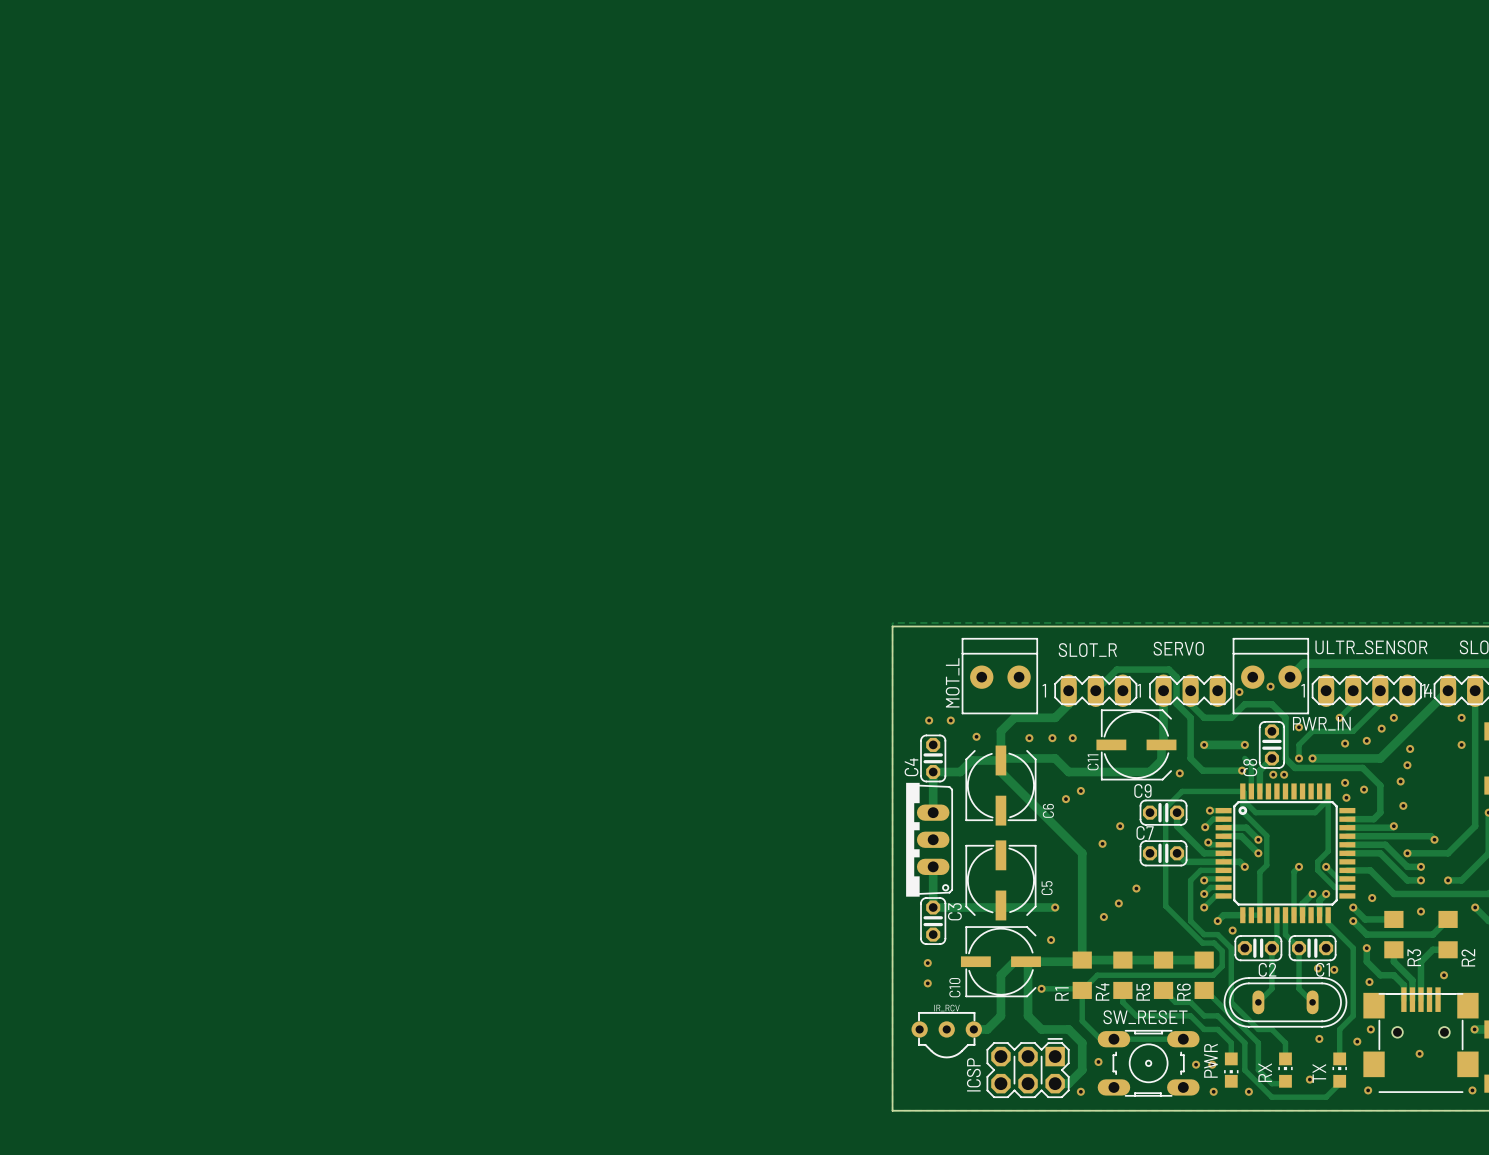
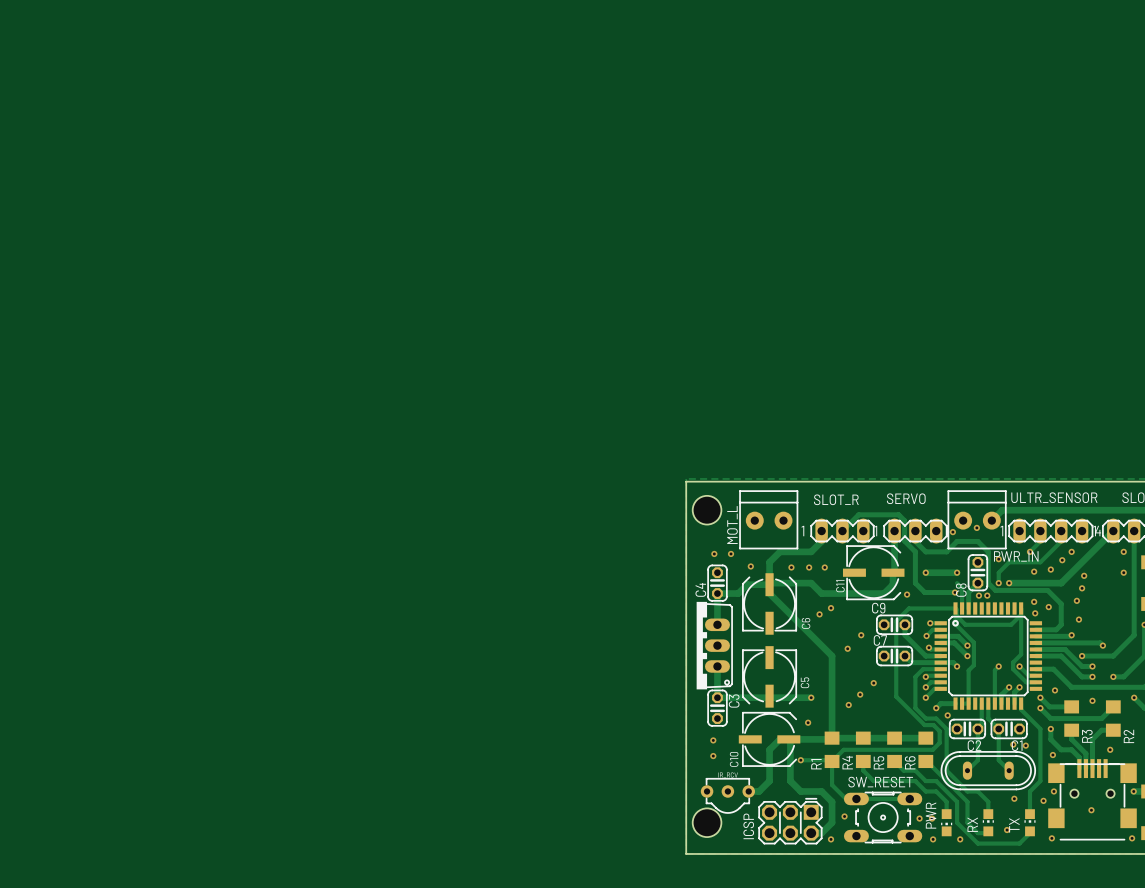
hole: none -> (707, 510)
hole: none -> (707, 822)

